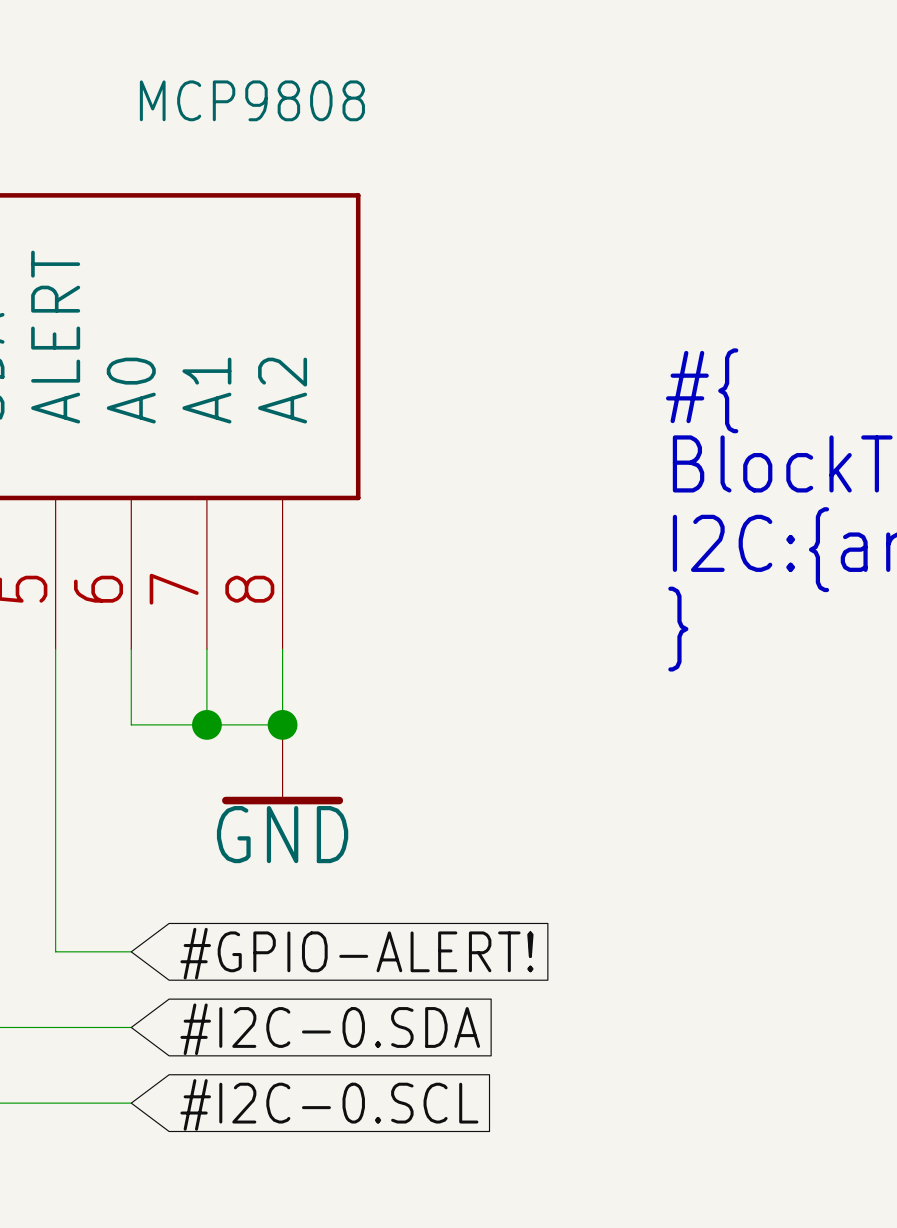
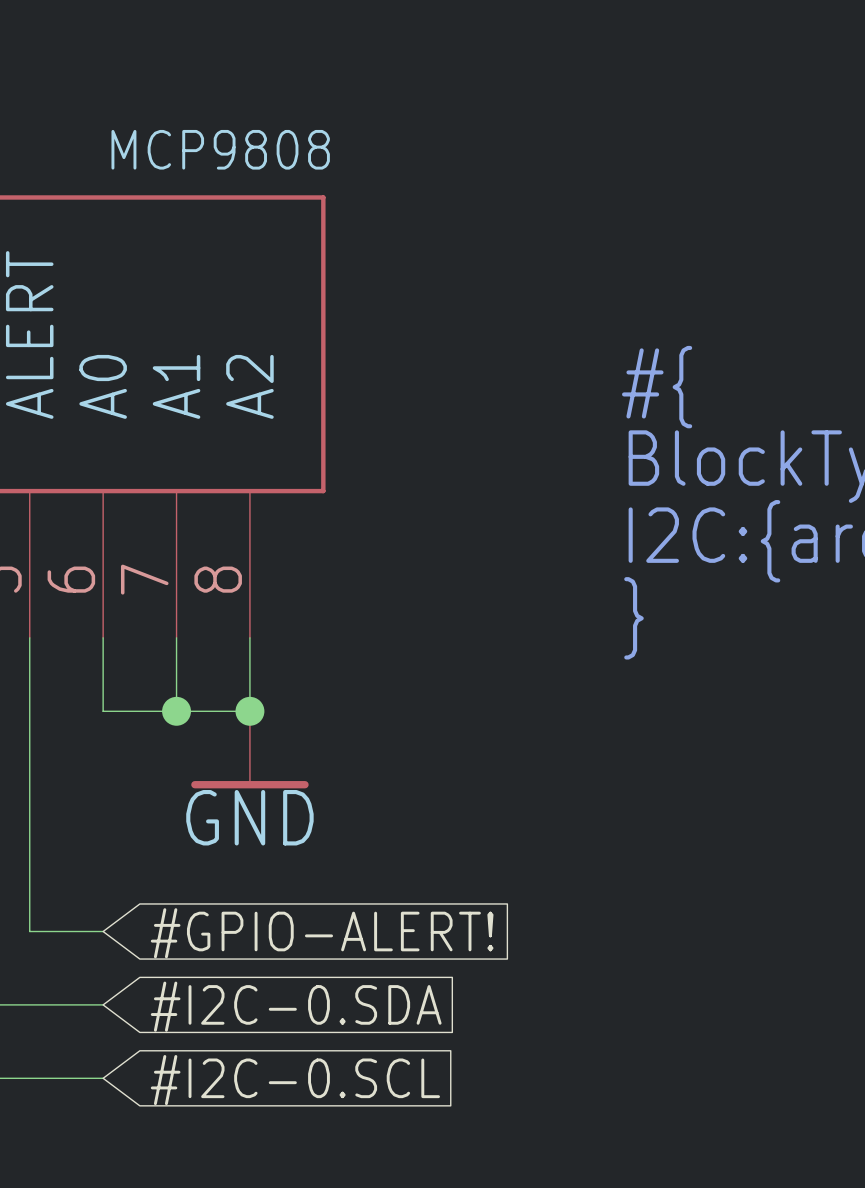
part value position: MCP9808 (252, 100) -> MCP9808 (220, 149)

